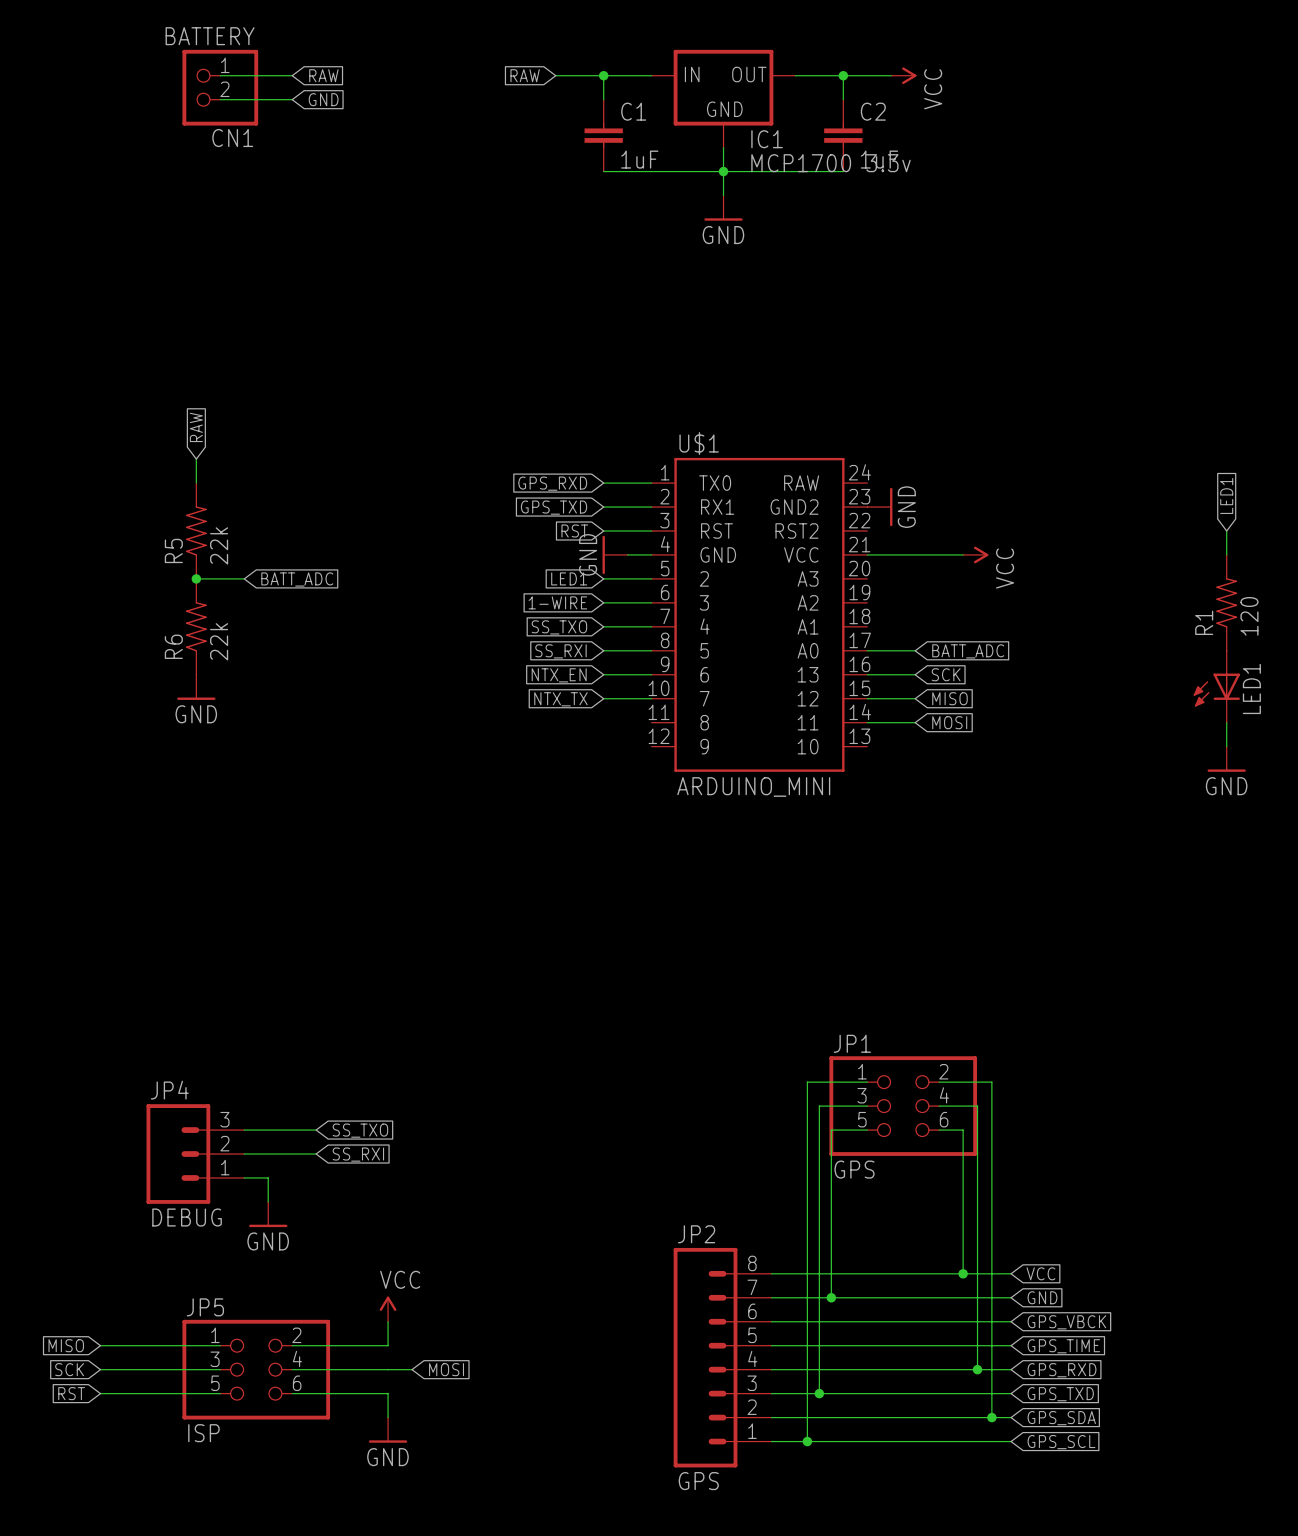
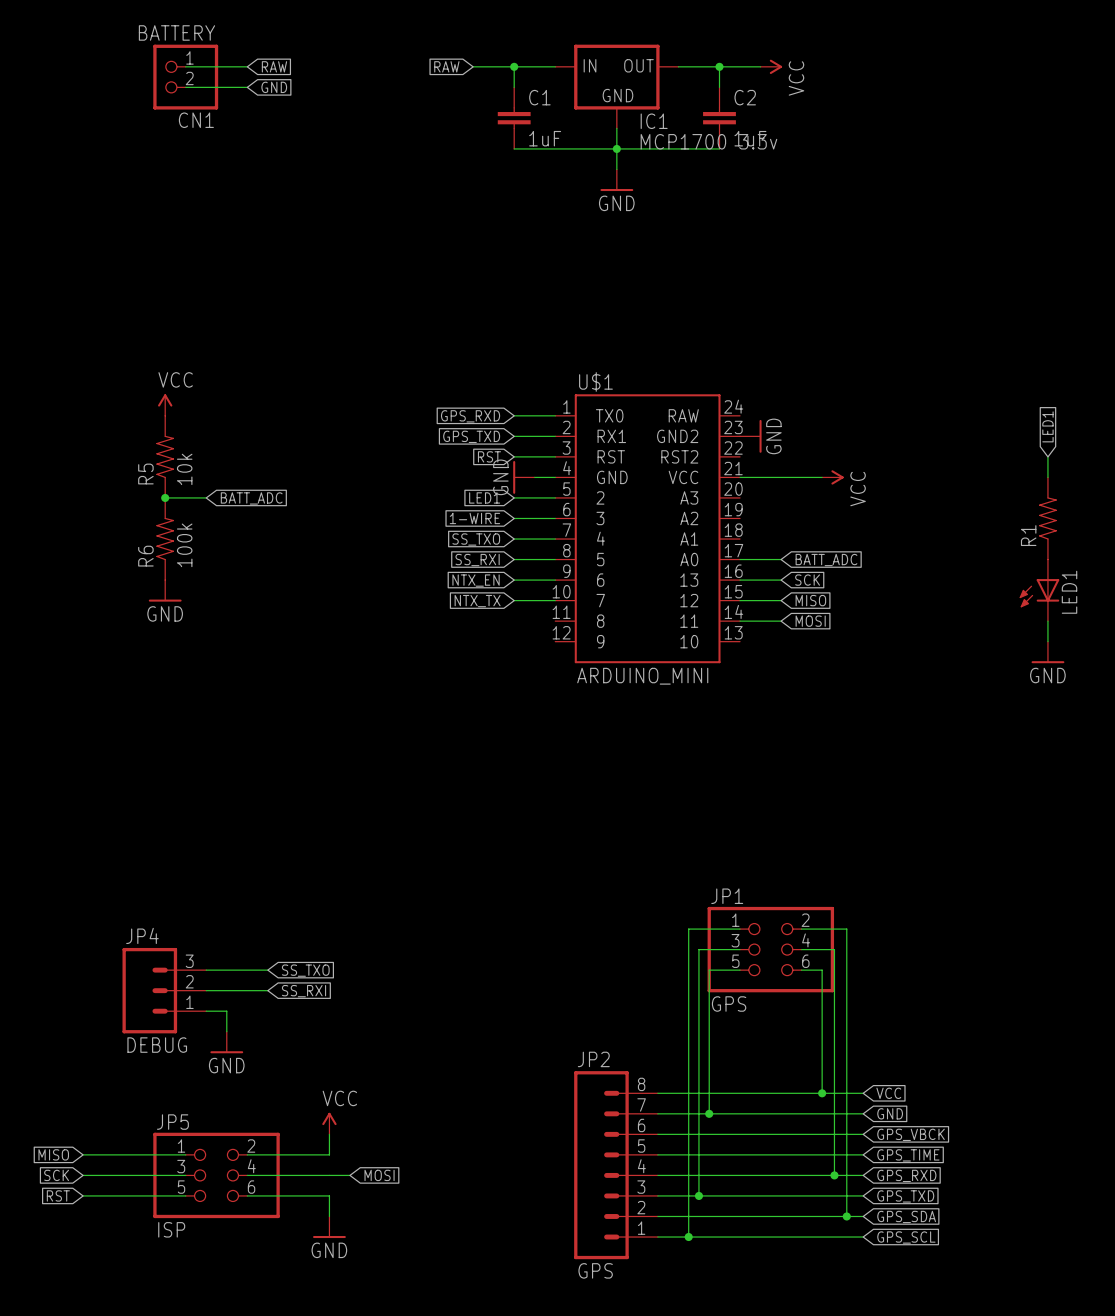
global label: RAW (196, 427) -> none
power symbol: none -> VCC (165, 405)
R5 value: 22k (219, 545) -> 10k (184, 469)
R1 value: 120 (1249, 616) -> none
R6 value: 22k (219, 641) -> 100k (184, 545)

